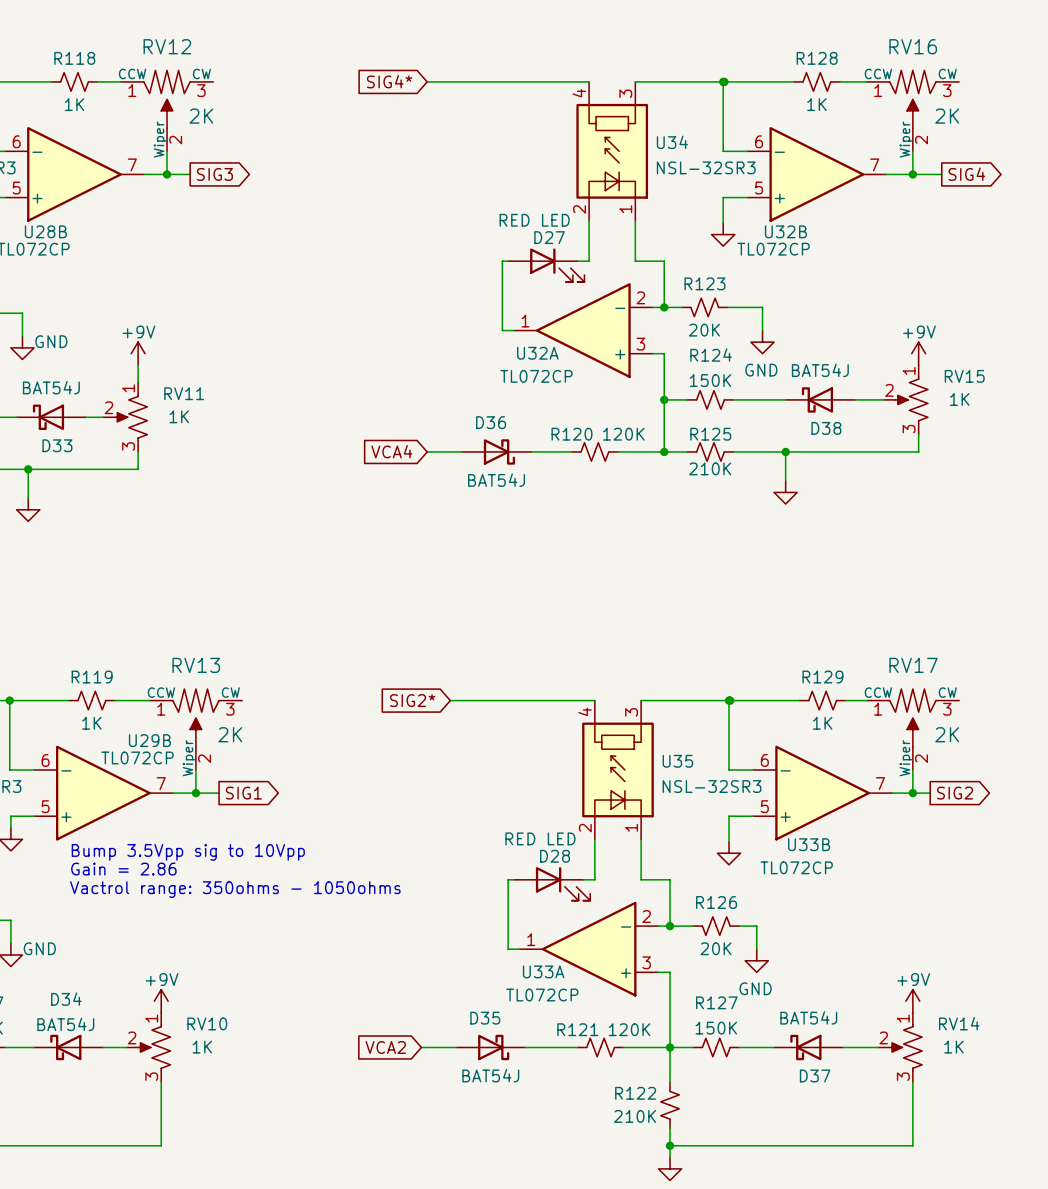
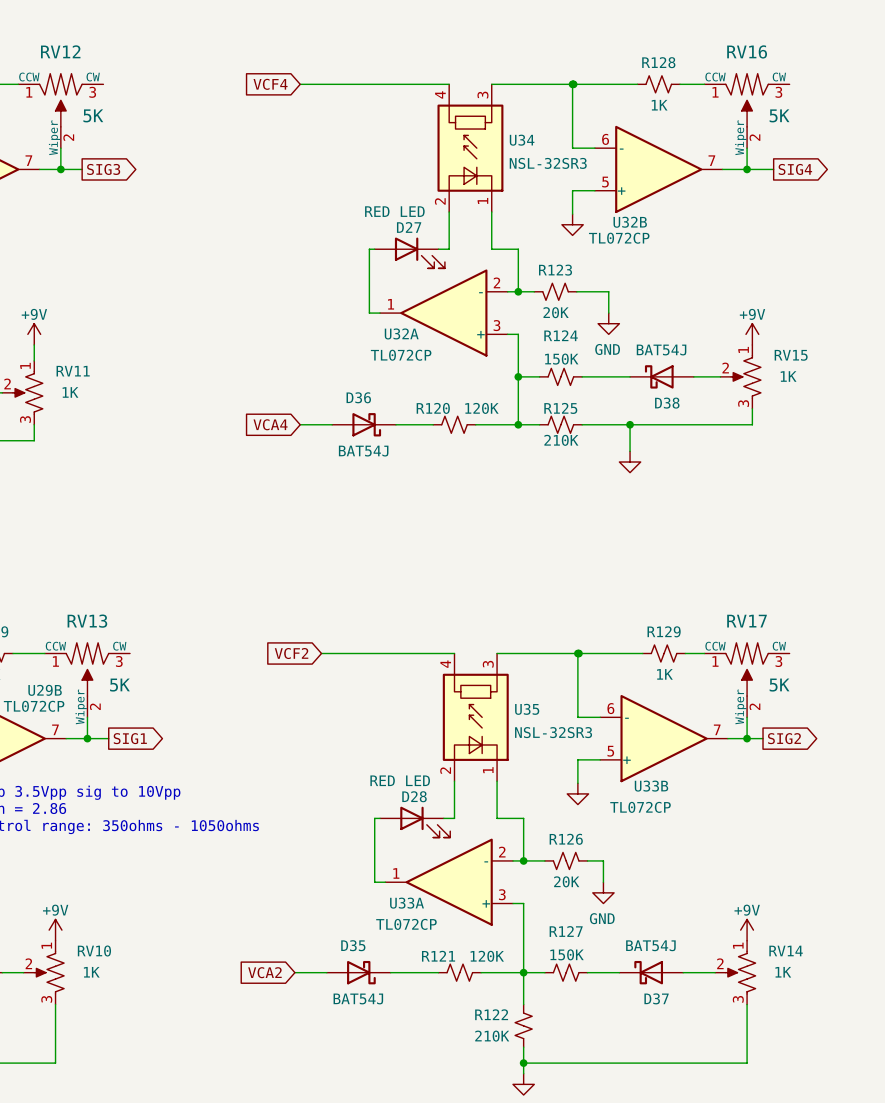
global label: SIG4* (389, 81) -> VCF4 (270, 84)
RV12 value: 2K (201, 116) -> 5K (93, 115)
RV16 value: 2K (947, 116) -> 5K (779, 115)
global label: SIG2* (412, 700) -> VCF2 (291, 653)
RV13 value: 2K (230, 734) -> 5K (119, 685)
RV17 value: 2K (947, 734) -> 5K (779, 685)

